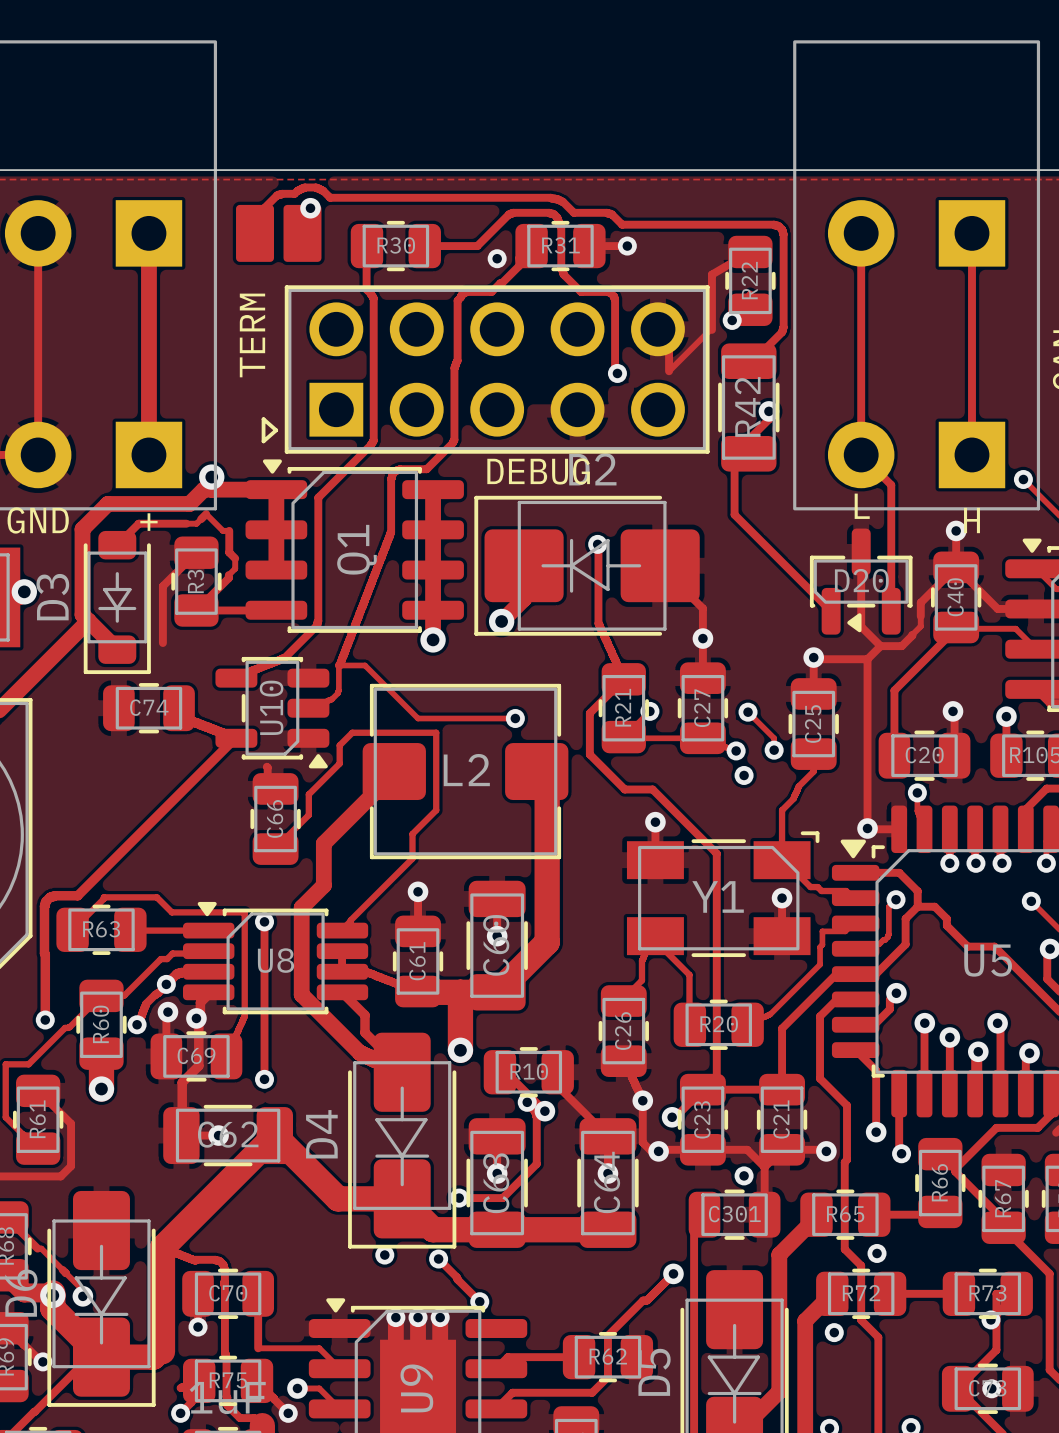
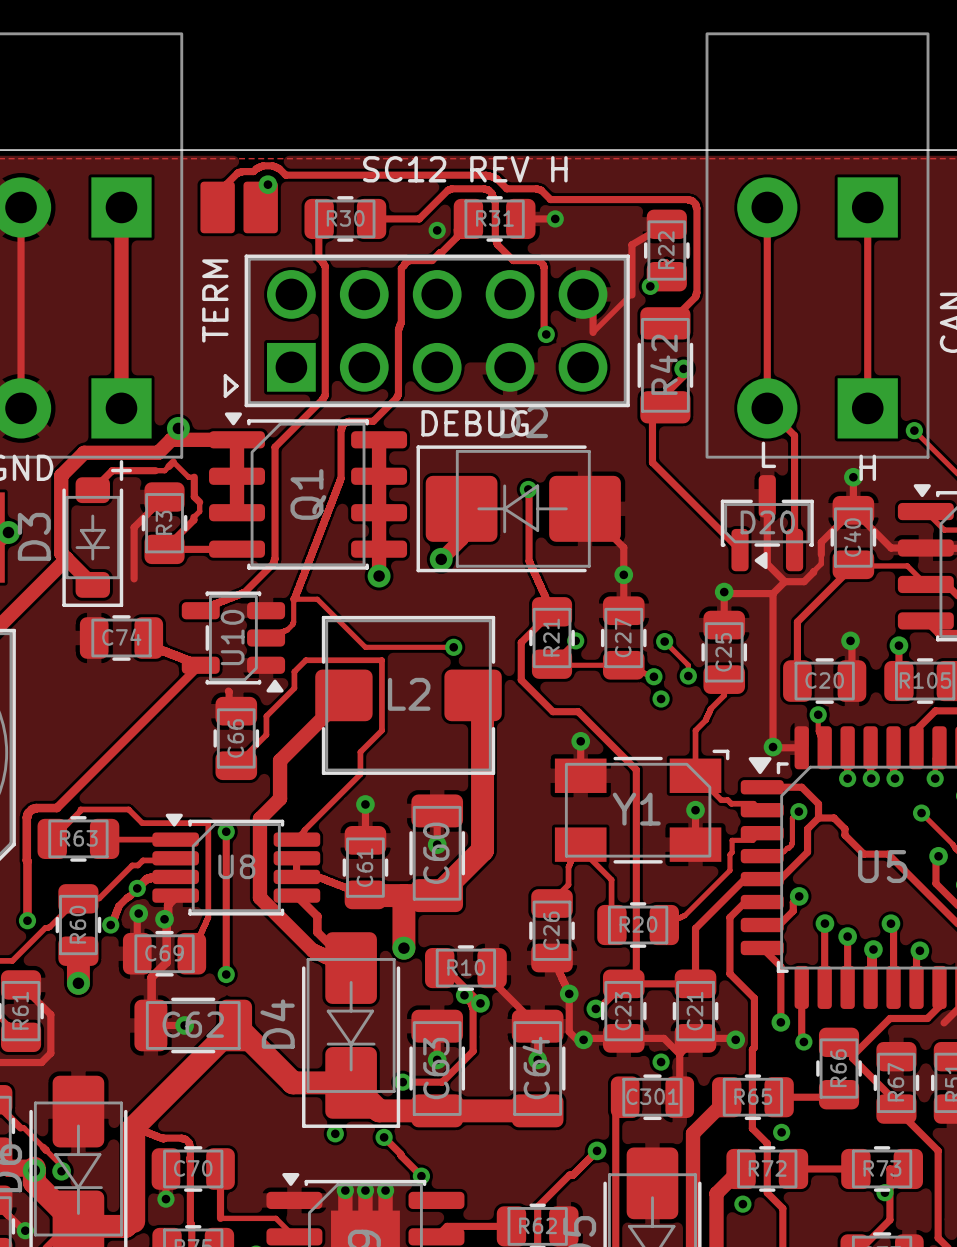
text: none -> SC12 REV H (465, 169)

